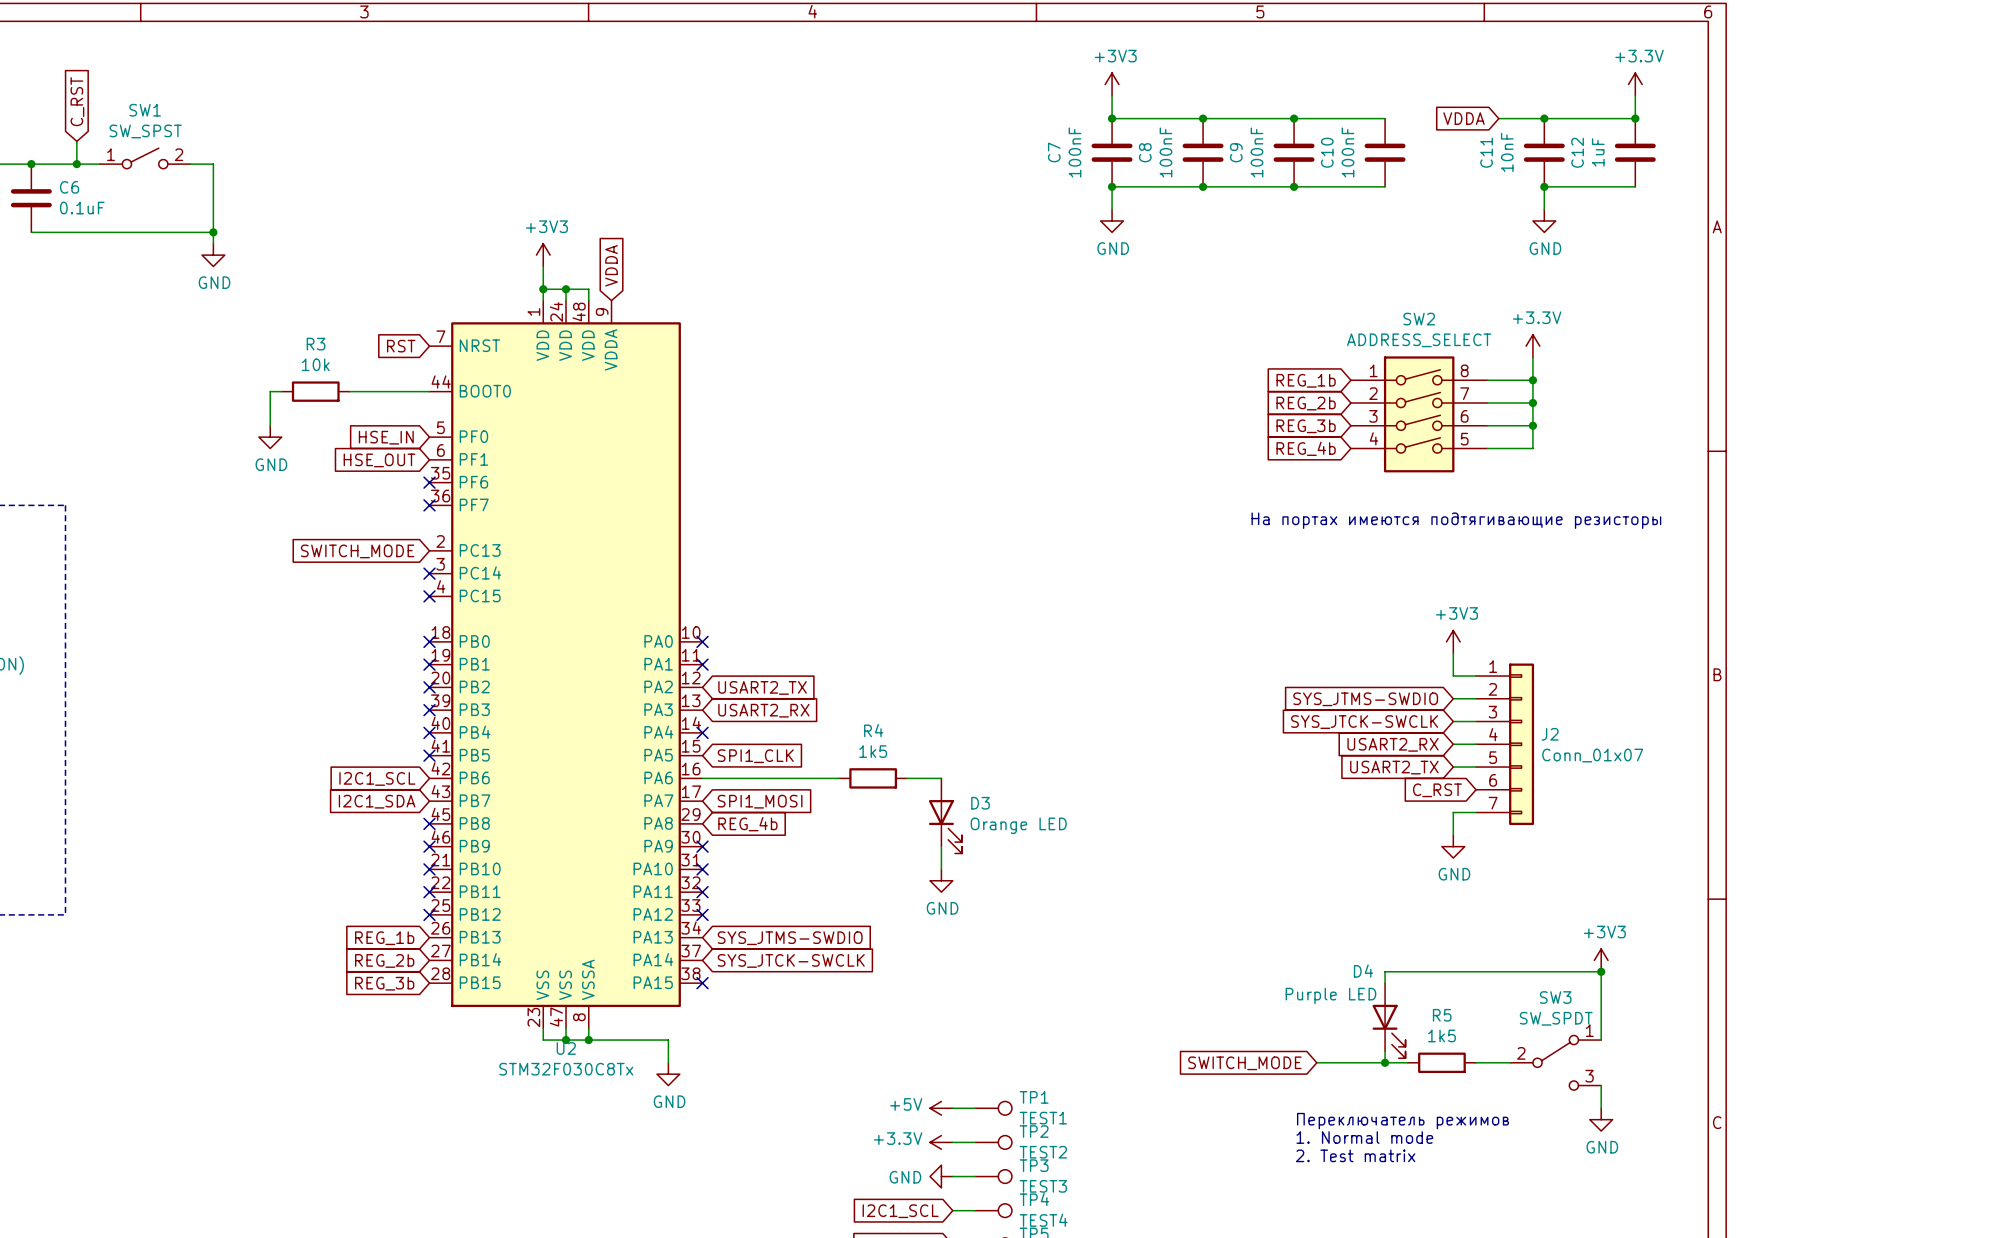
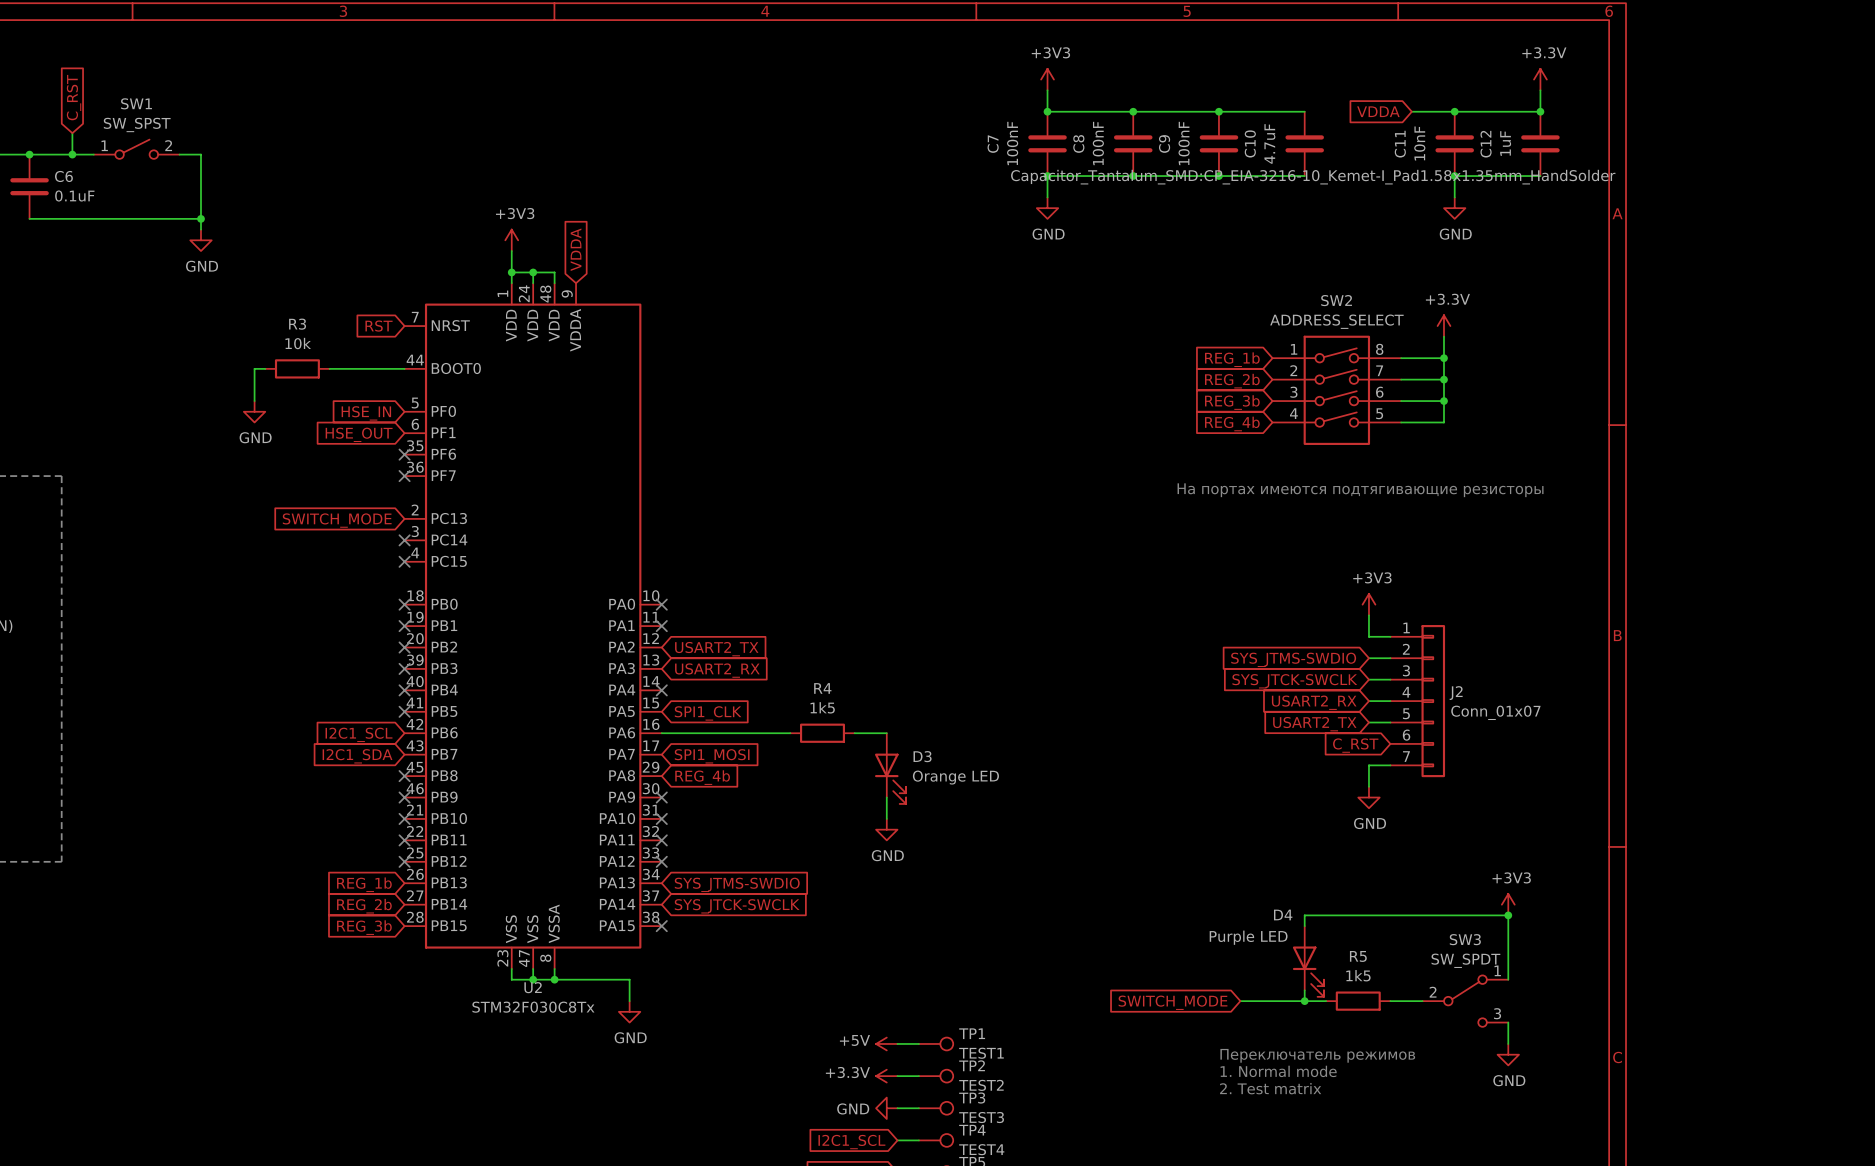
C10 value: 100nF (1348, 152) -> 4.7uF (1269, 143)
C10 text: none -> Capacitor_Tantalum_SMD:CP_EIA-3216-10_Kemet-I_Pad1.58x1.35mm_HandSolder (1313, 177)

